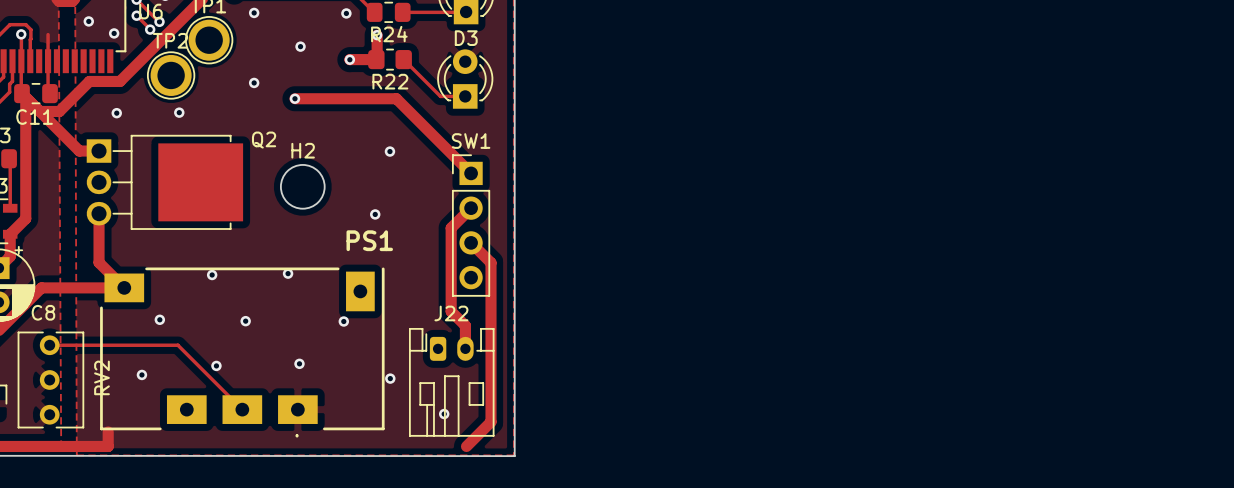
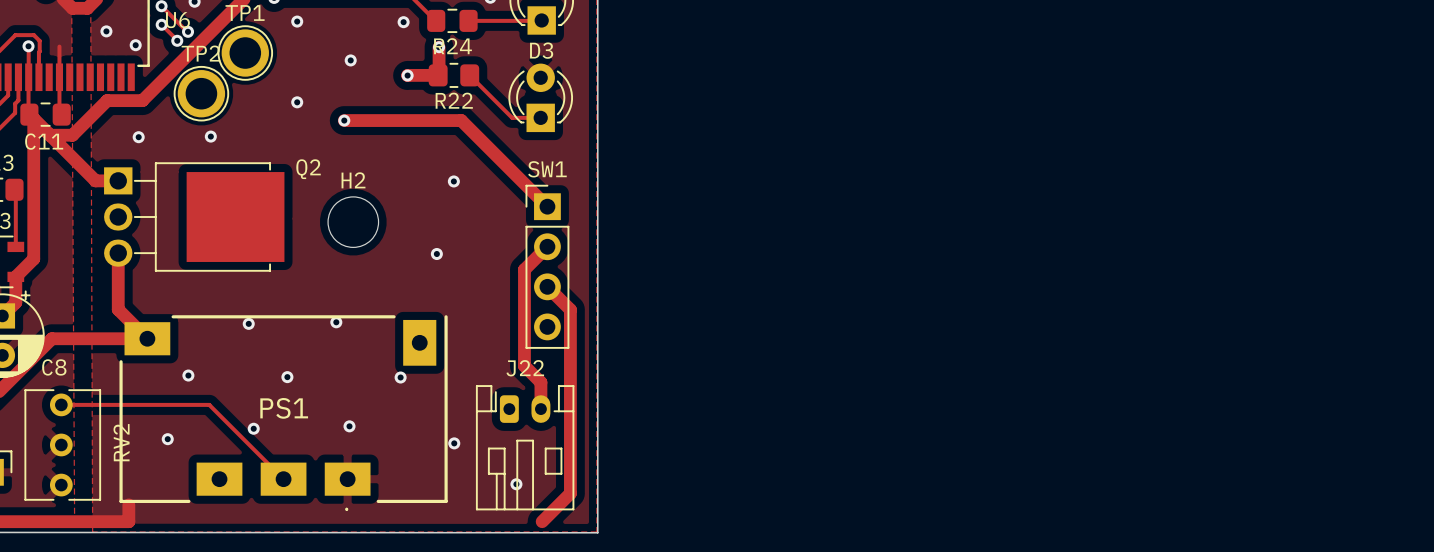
PS1 name position: PS1 (369, 240) -> PS1 (284, 408)

